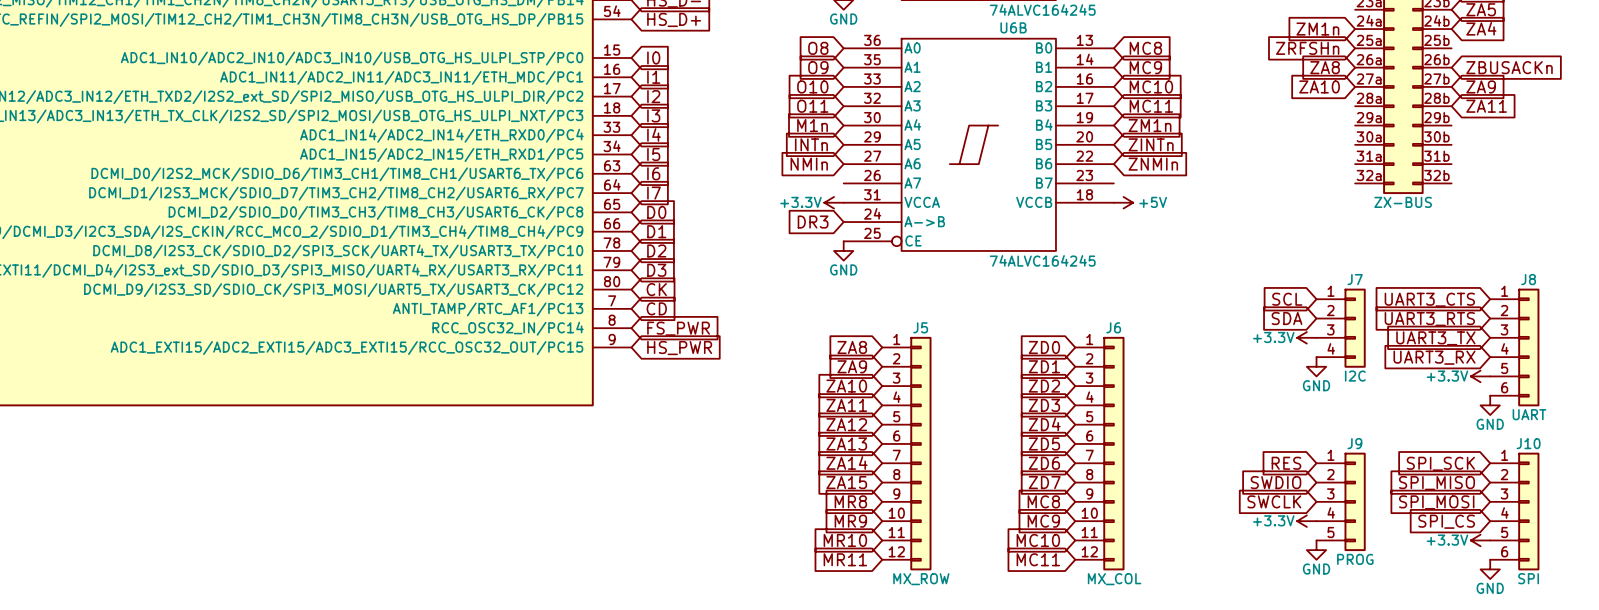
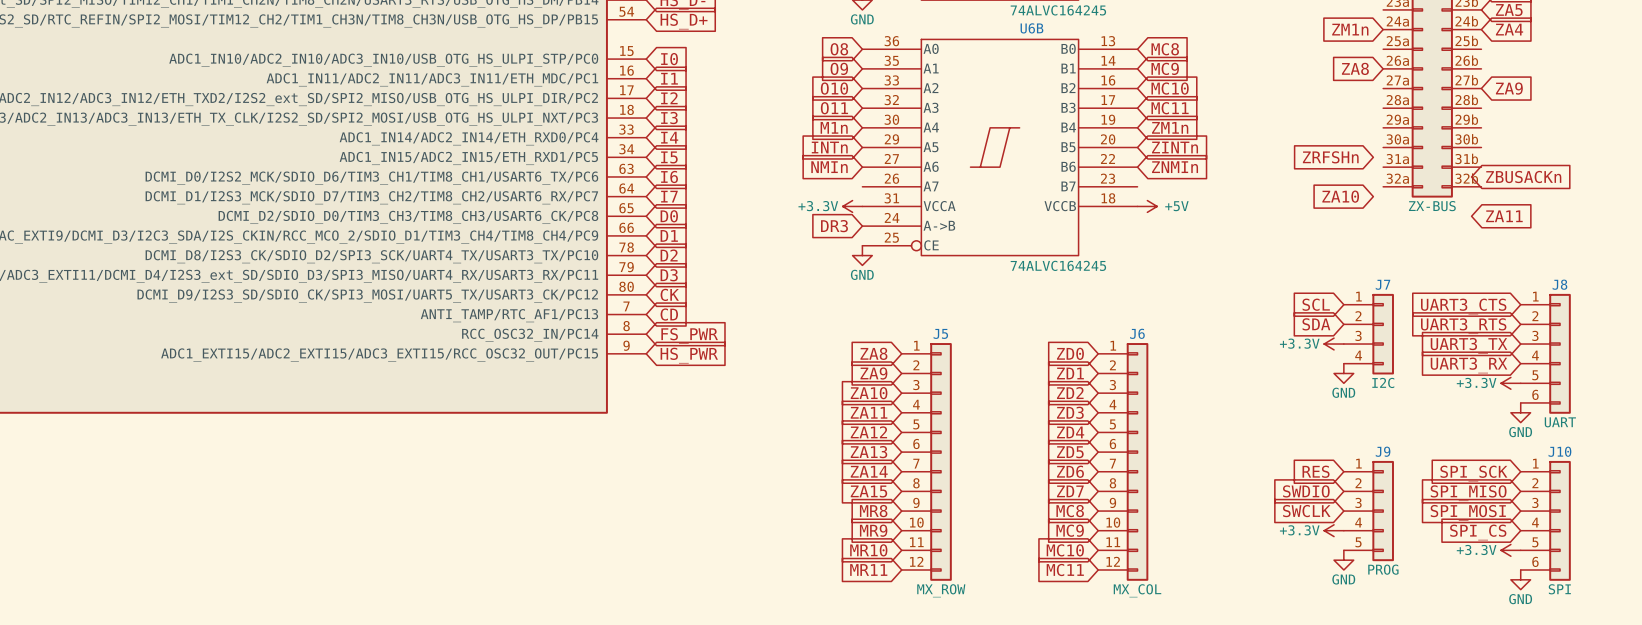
global label position: ZRFSHn (1307, 48) -> ZRFSHn (1330, 157)
global label position: ZBUSACKn (1509, 67) -> ZBUSACKn (1523, 176)
global label position: ZA10 (1319, 86) -> ZA10 (1340, 196)
global label position: ZA11 (1486, 106) -> ZA11 (1504, 216)

